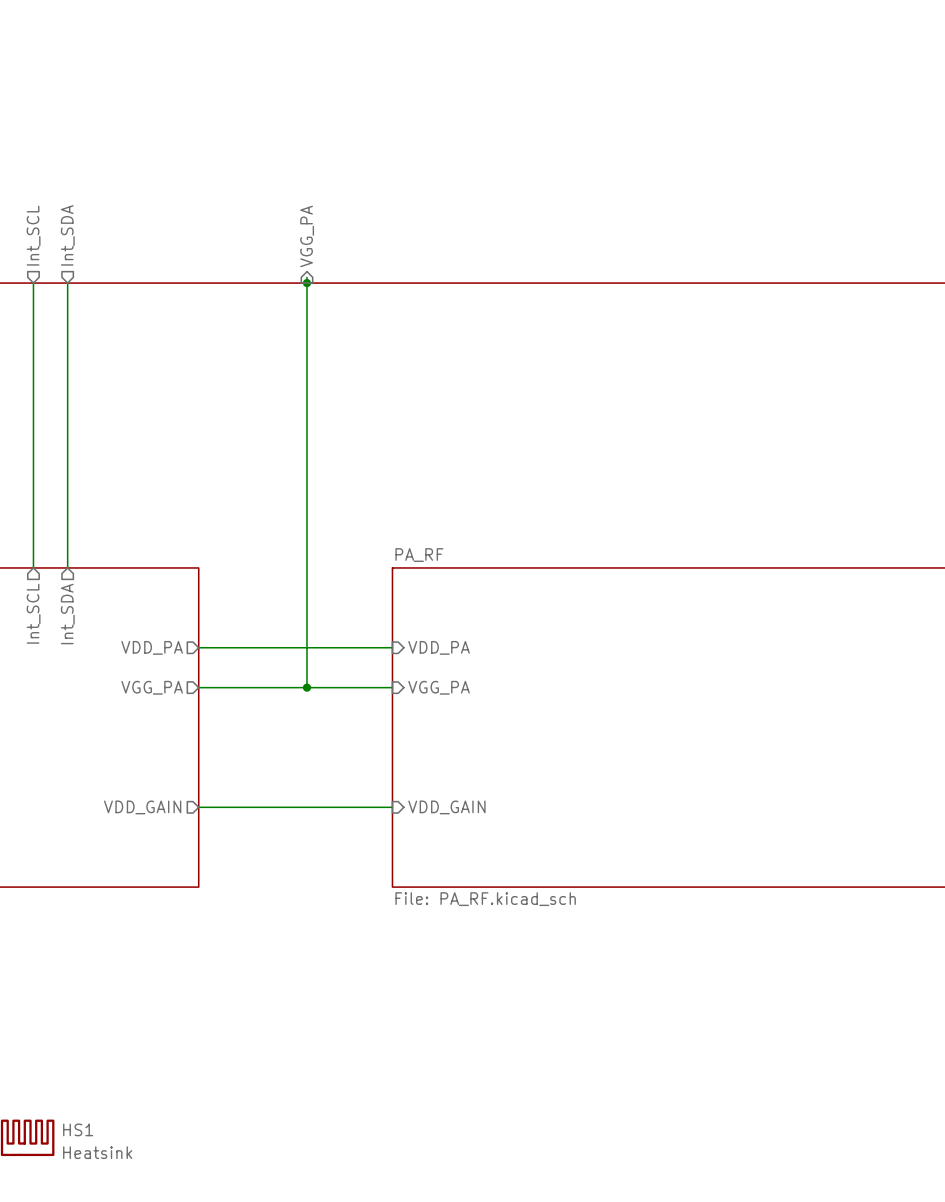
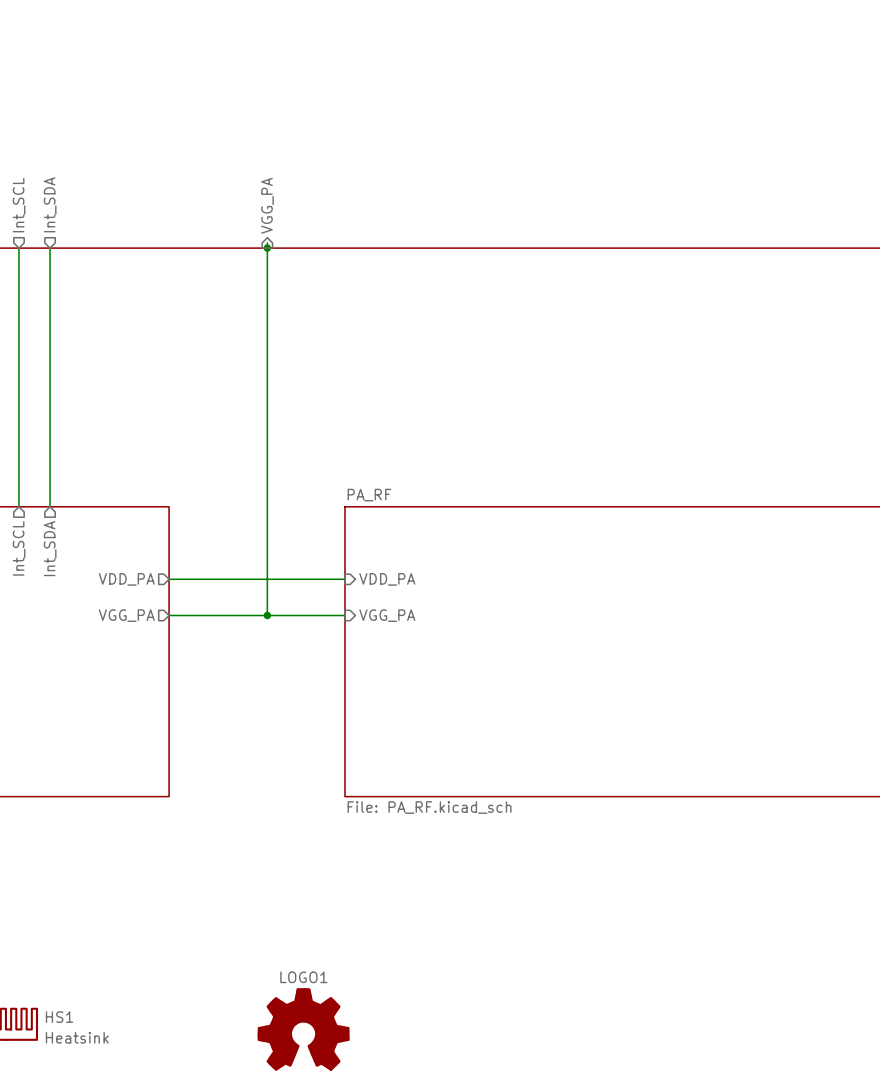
sheet pin: VDD_GAIN (142, 807) -> none
wire: (198, 807) (392, 807) -> none
sheet pin: VDD_GAIN (446, 807) -> none
LOGO1: none -> (303, 1029)

